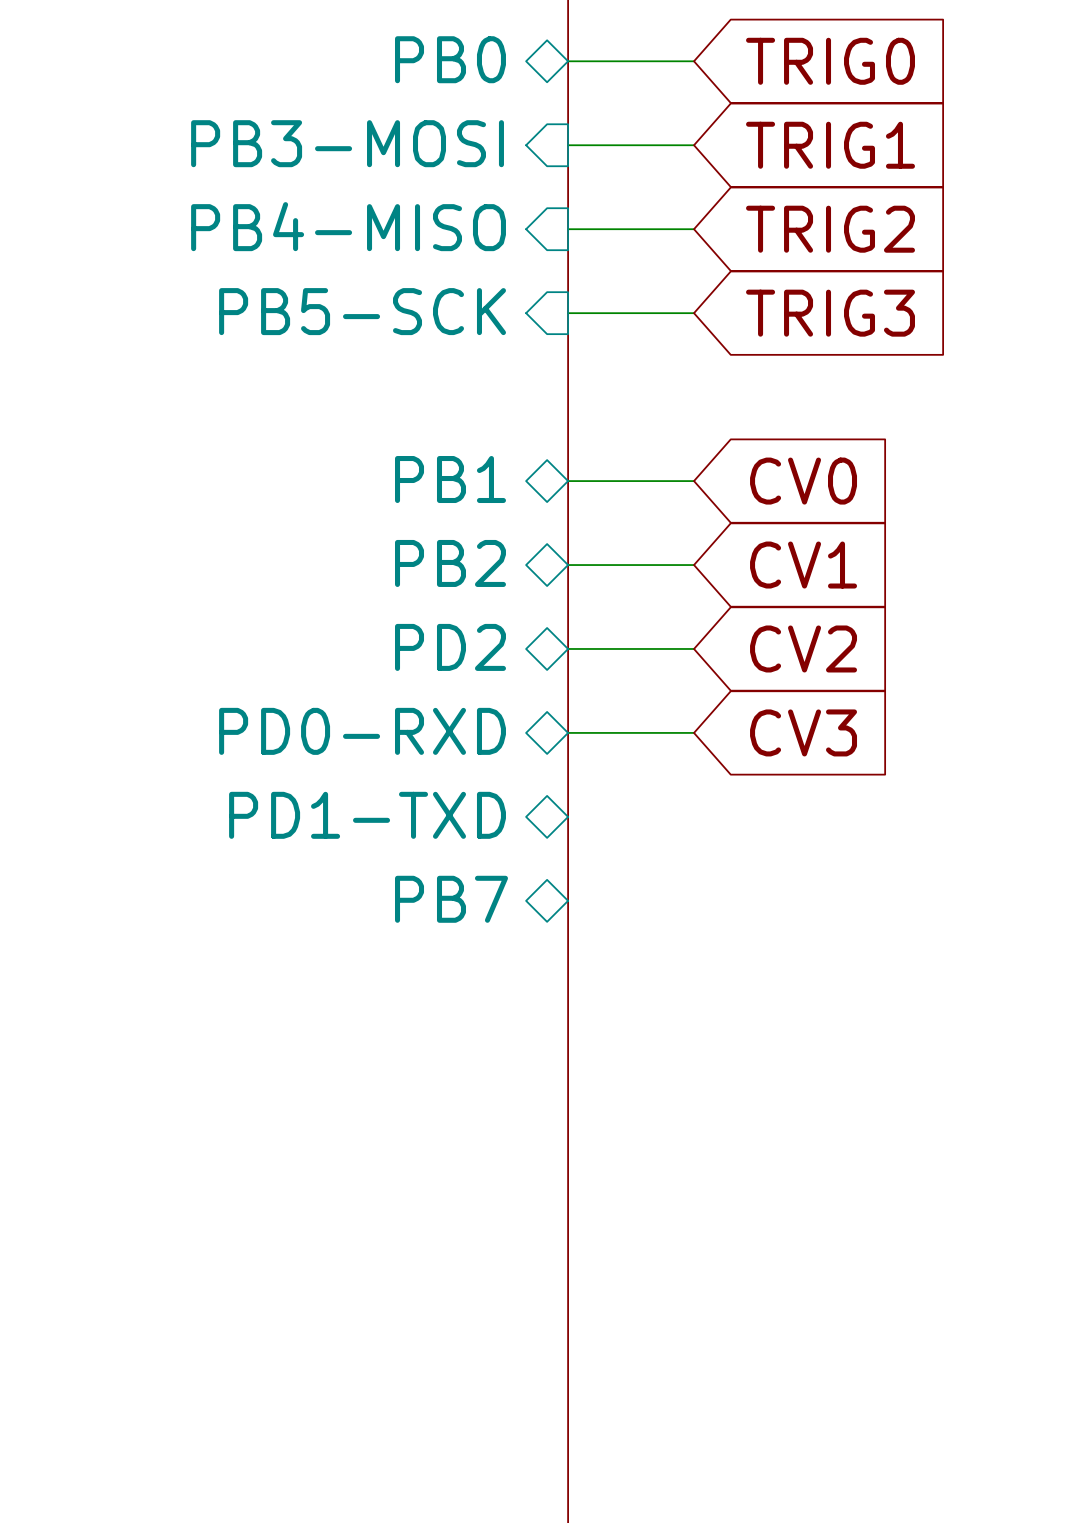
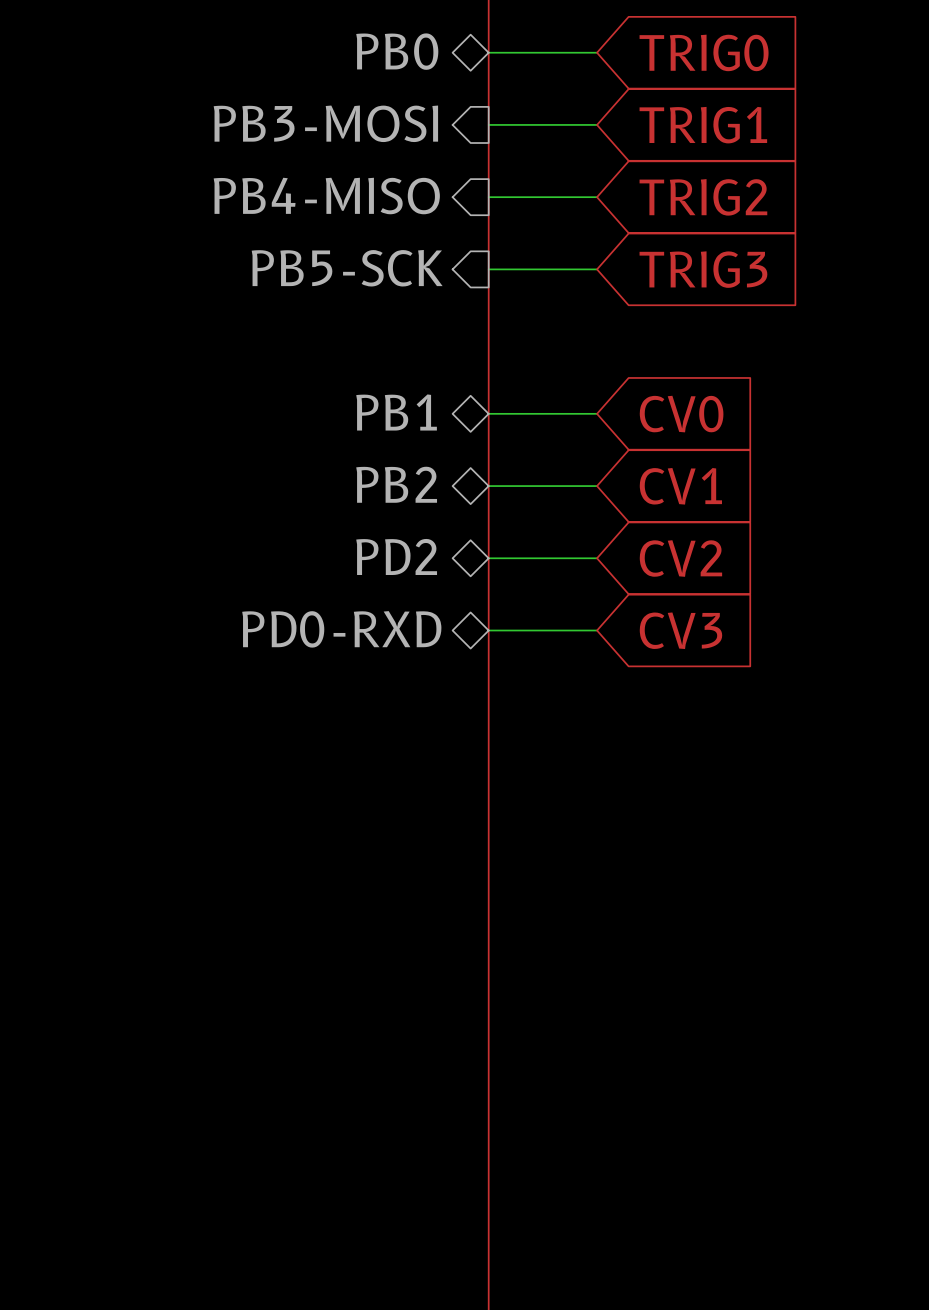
sheet pin: PD1-TXD (367, 815) -> none
sheet pin: PB7 (451, 899) -> none

